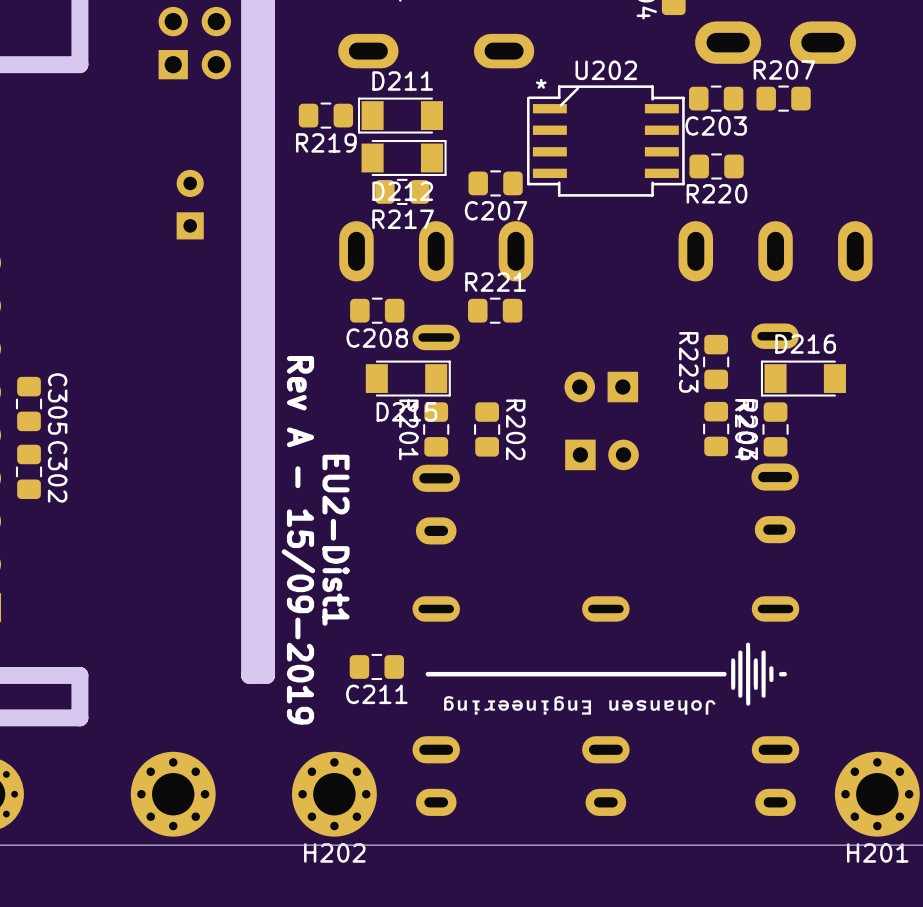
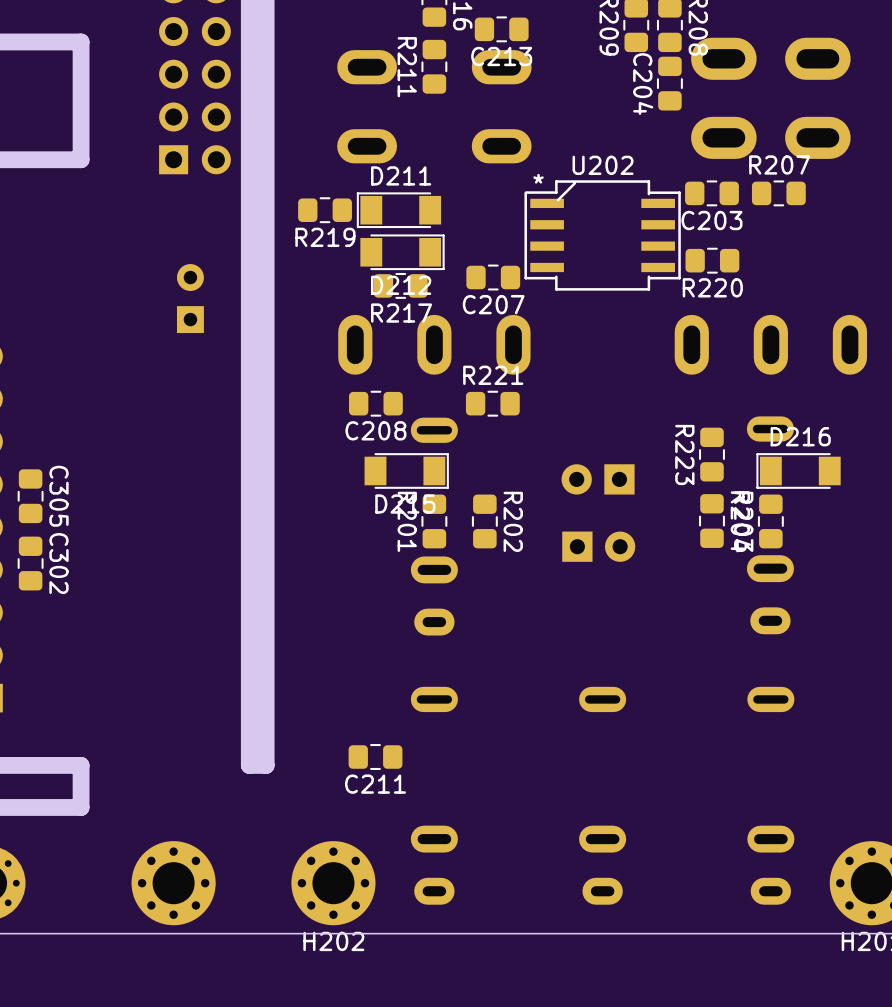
text: Rev A - 15/09-2019 (298, 540) -> none
text: EU2-Dist1 (336, 540) -> none
drawing: [425, 642, 787, 715] -> none

